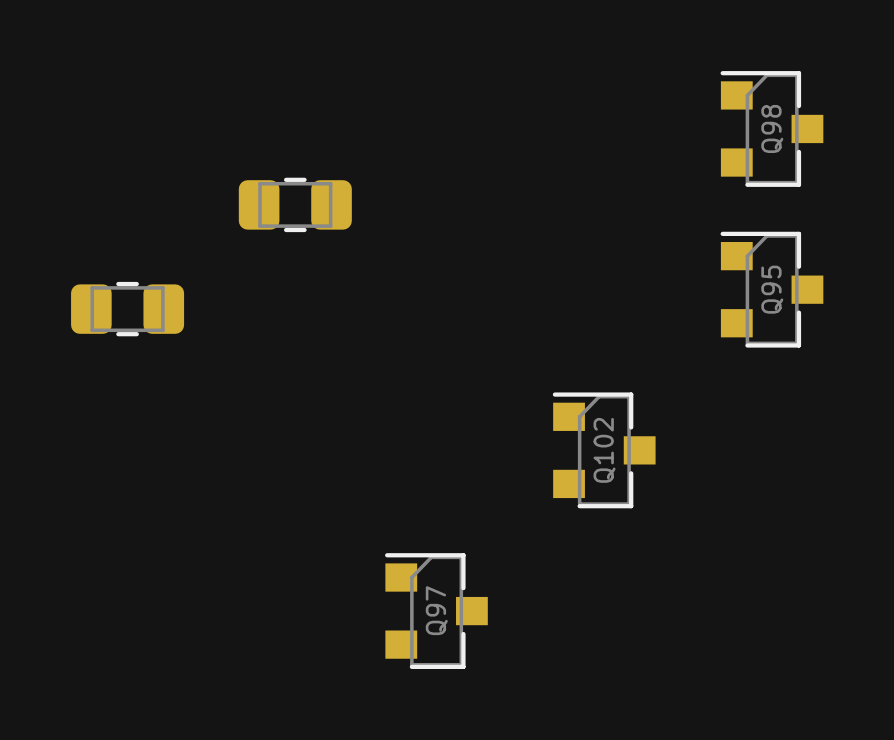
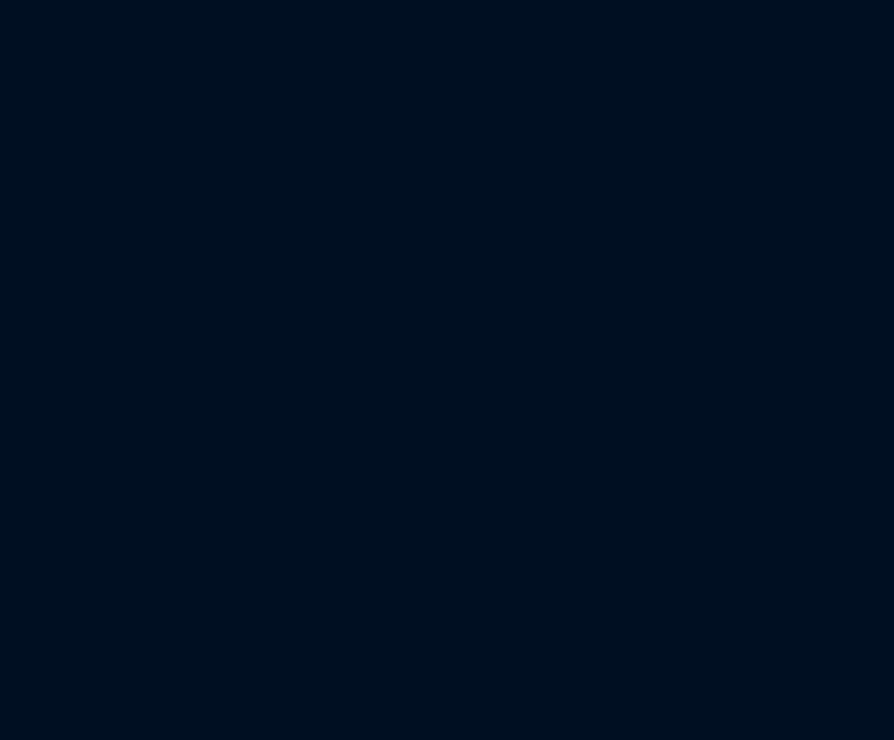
Q98: (771, 128) -> none
part: (295, 204) -> none
Q95: (771, 289) -> none
part: (127, 309) -> none
Q102: (604, 450) -> none
Q97: (436, 611) -> none

